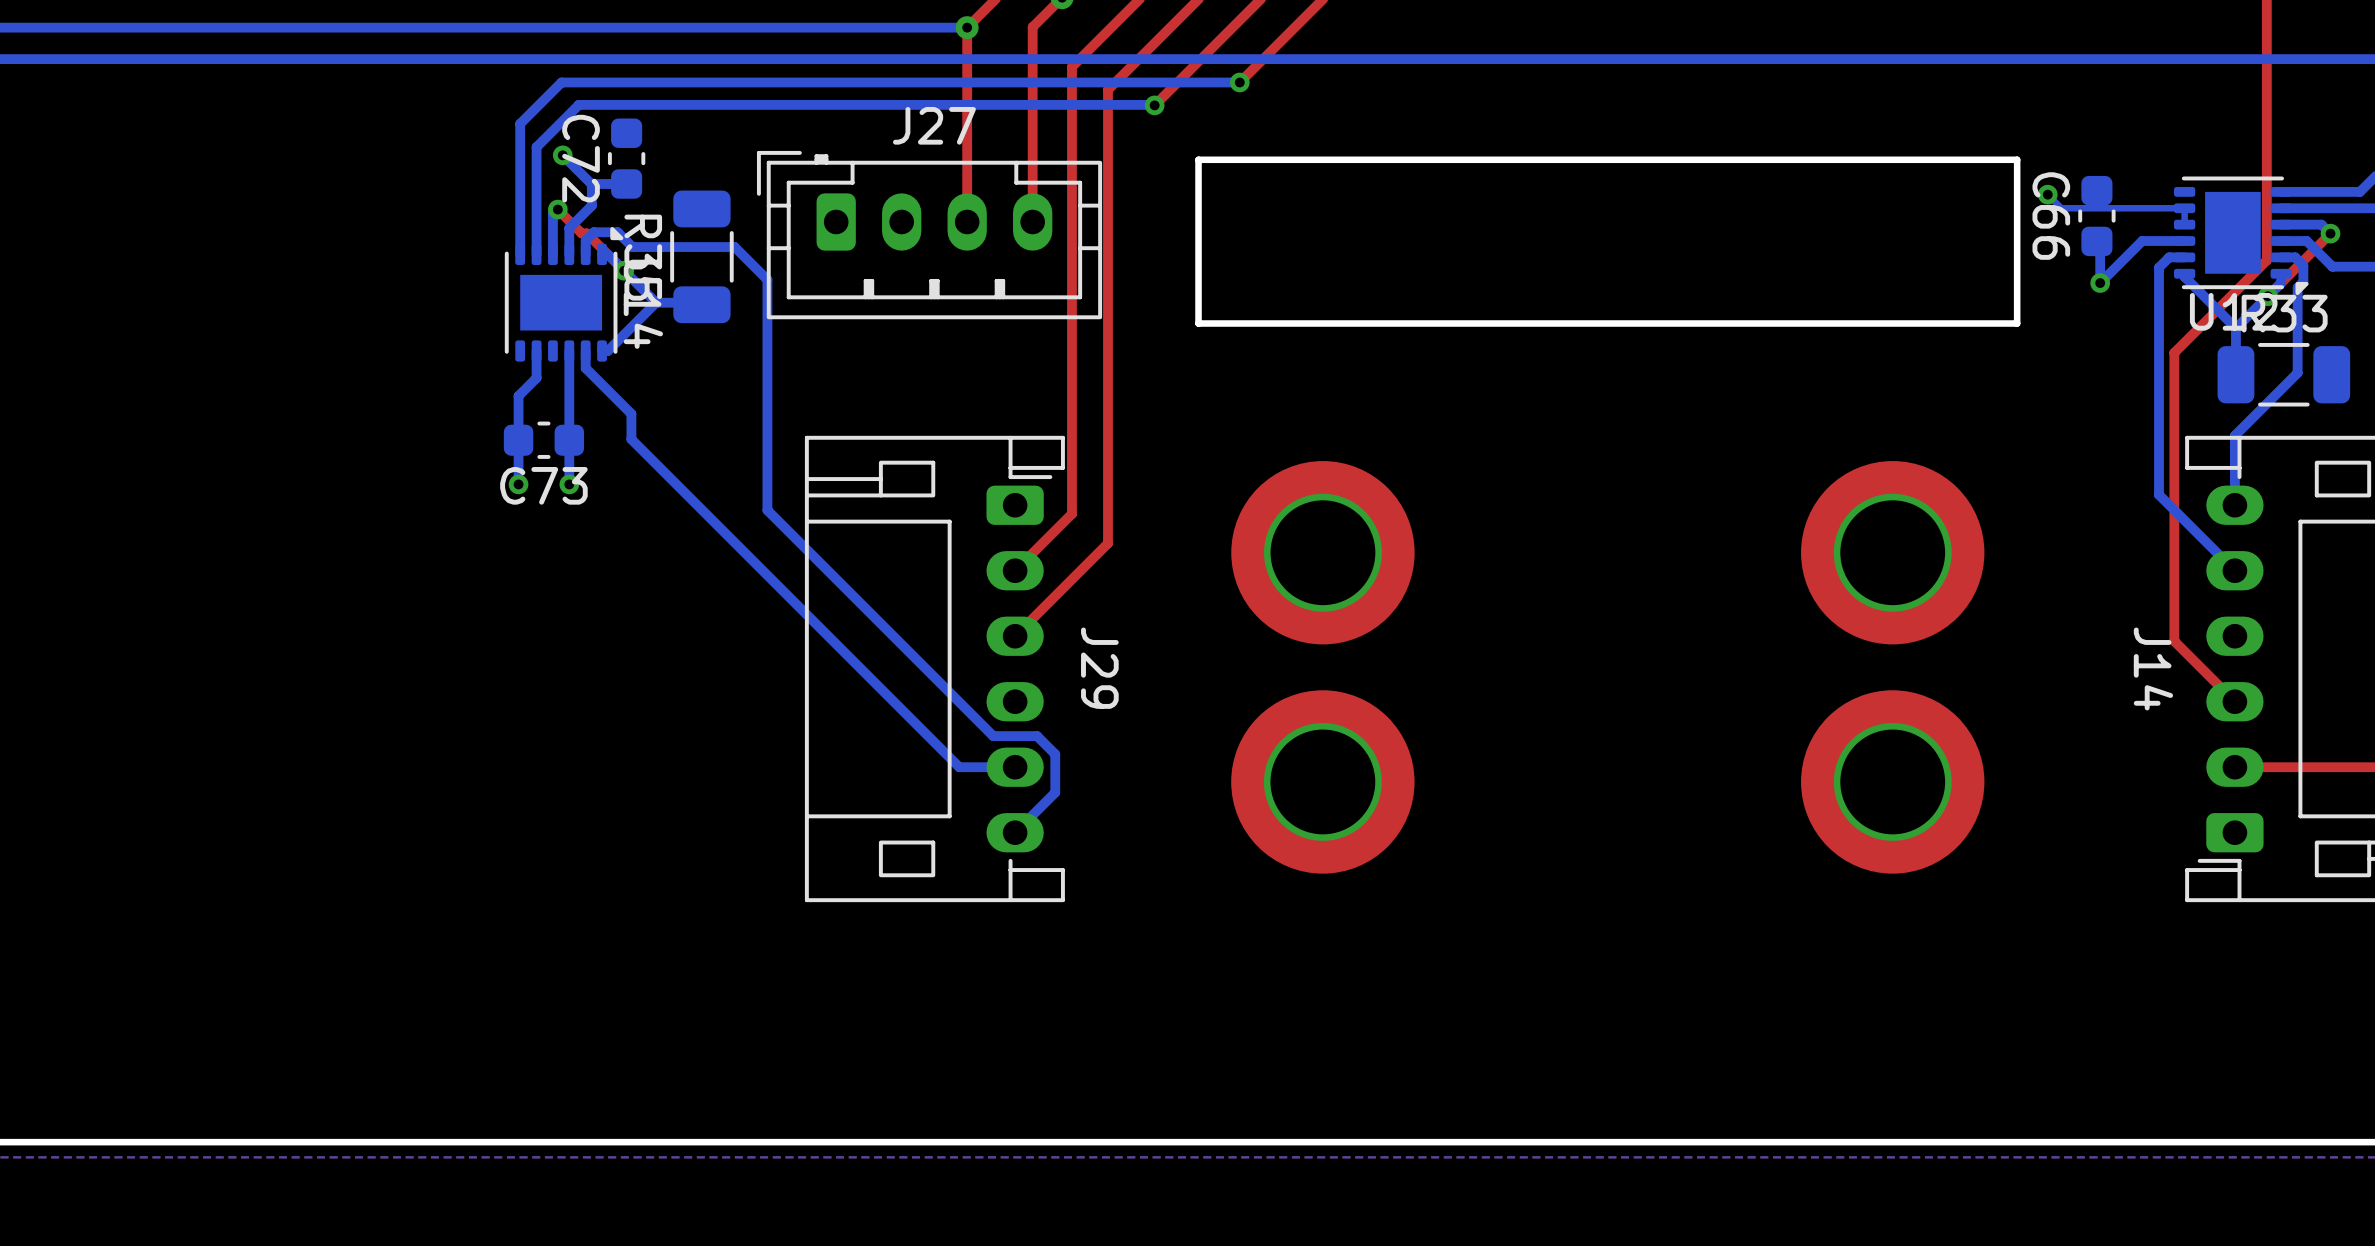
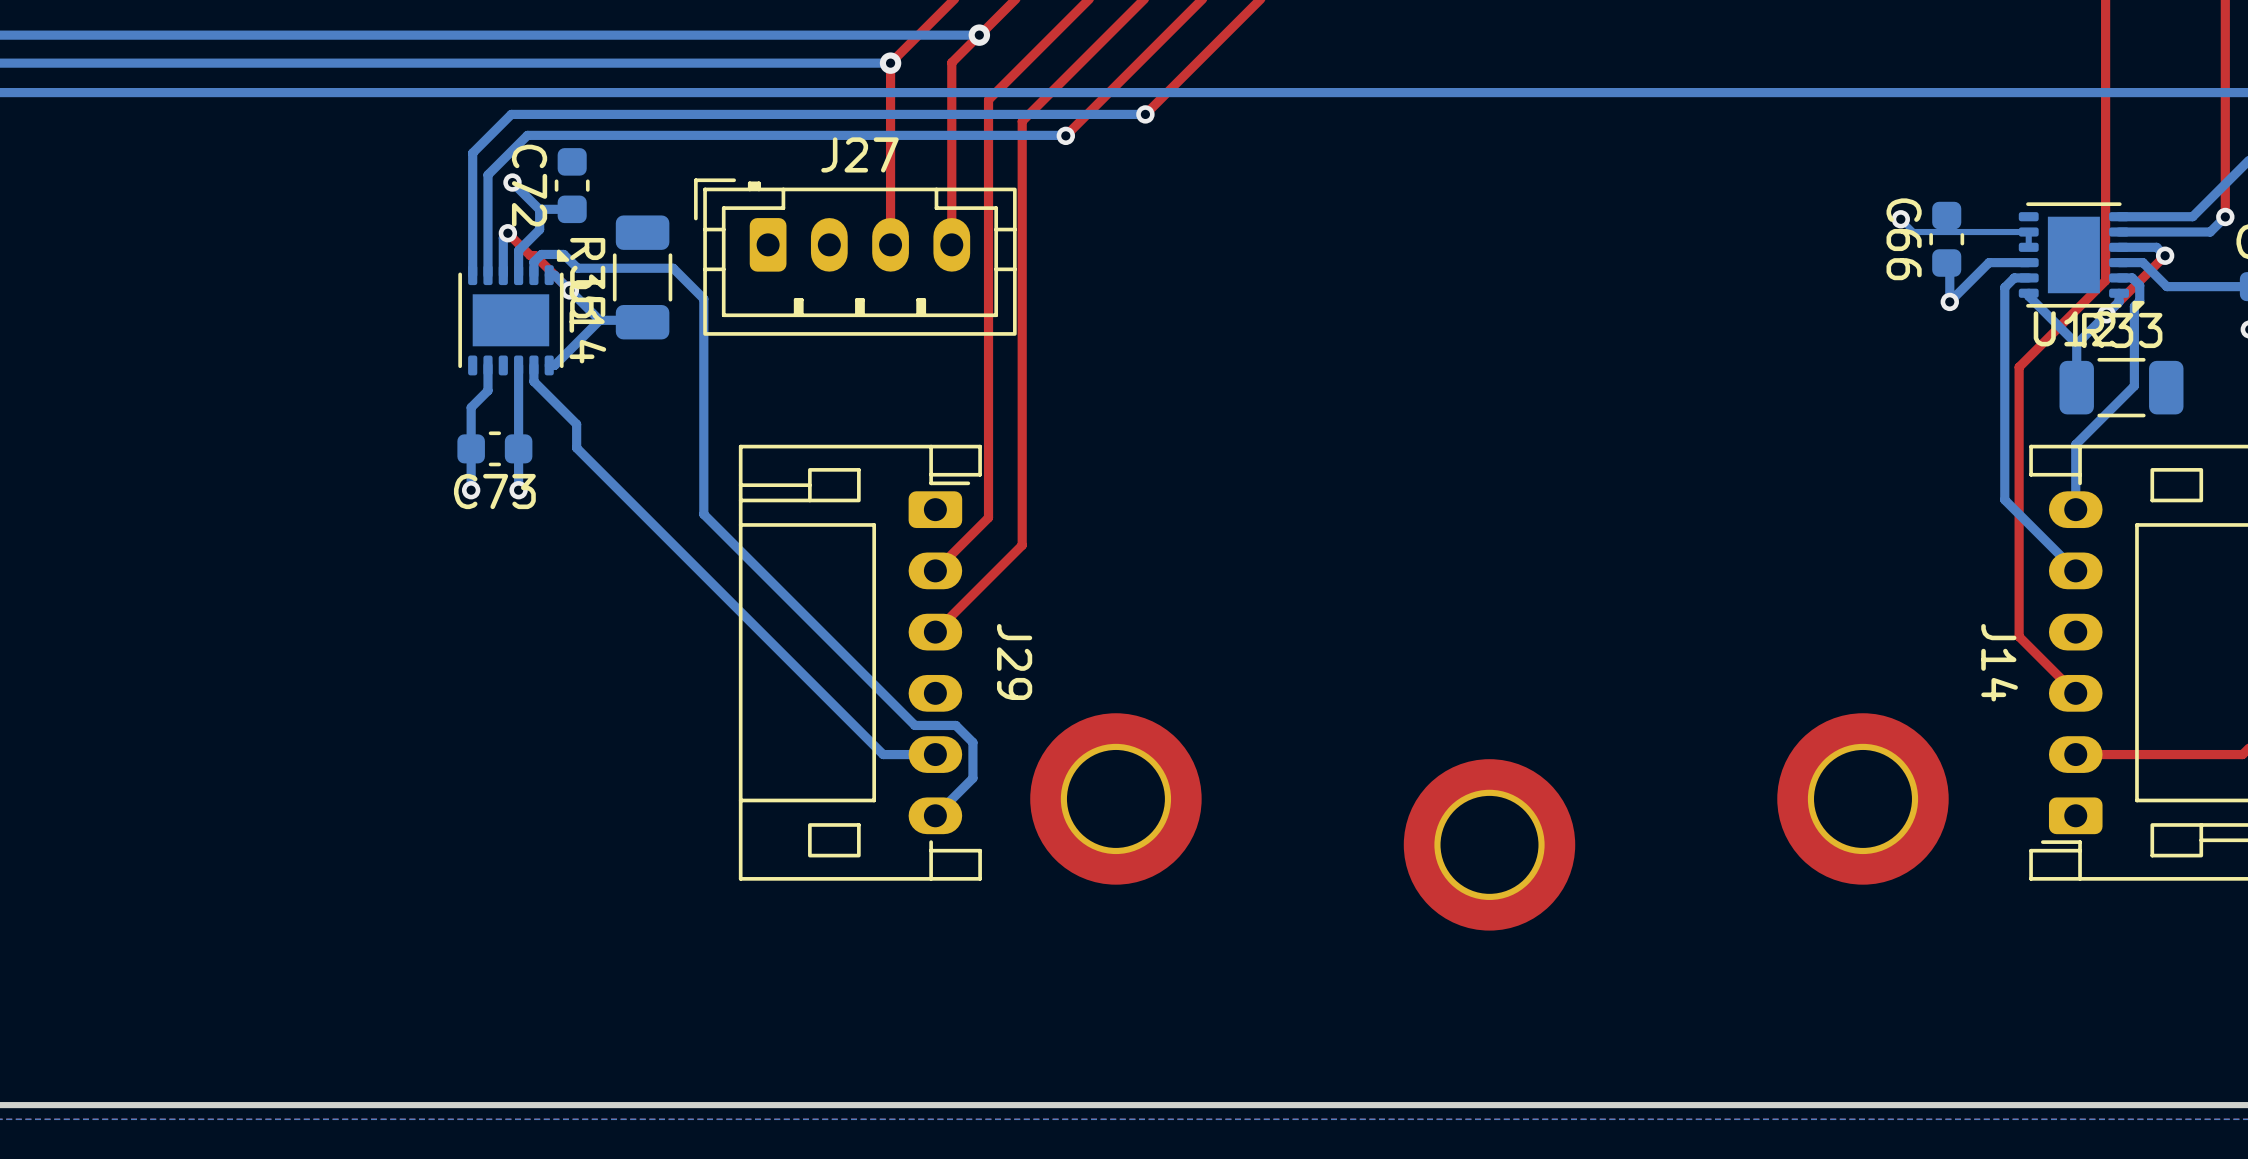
board edge: (2017, 159) (1198, 159) (1198, 323) (2017, 323) (2017, 159) -> none
part: (1322, 552) -> none
part: (1892, 552) -> none
part position: (1322, 781) -> (1115, 798)
part position: (1892, 781) -> (1862, 798)
part: none -> (1489, 844)

